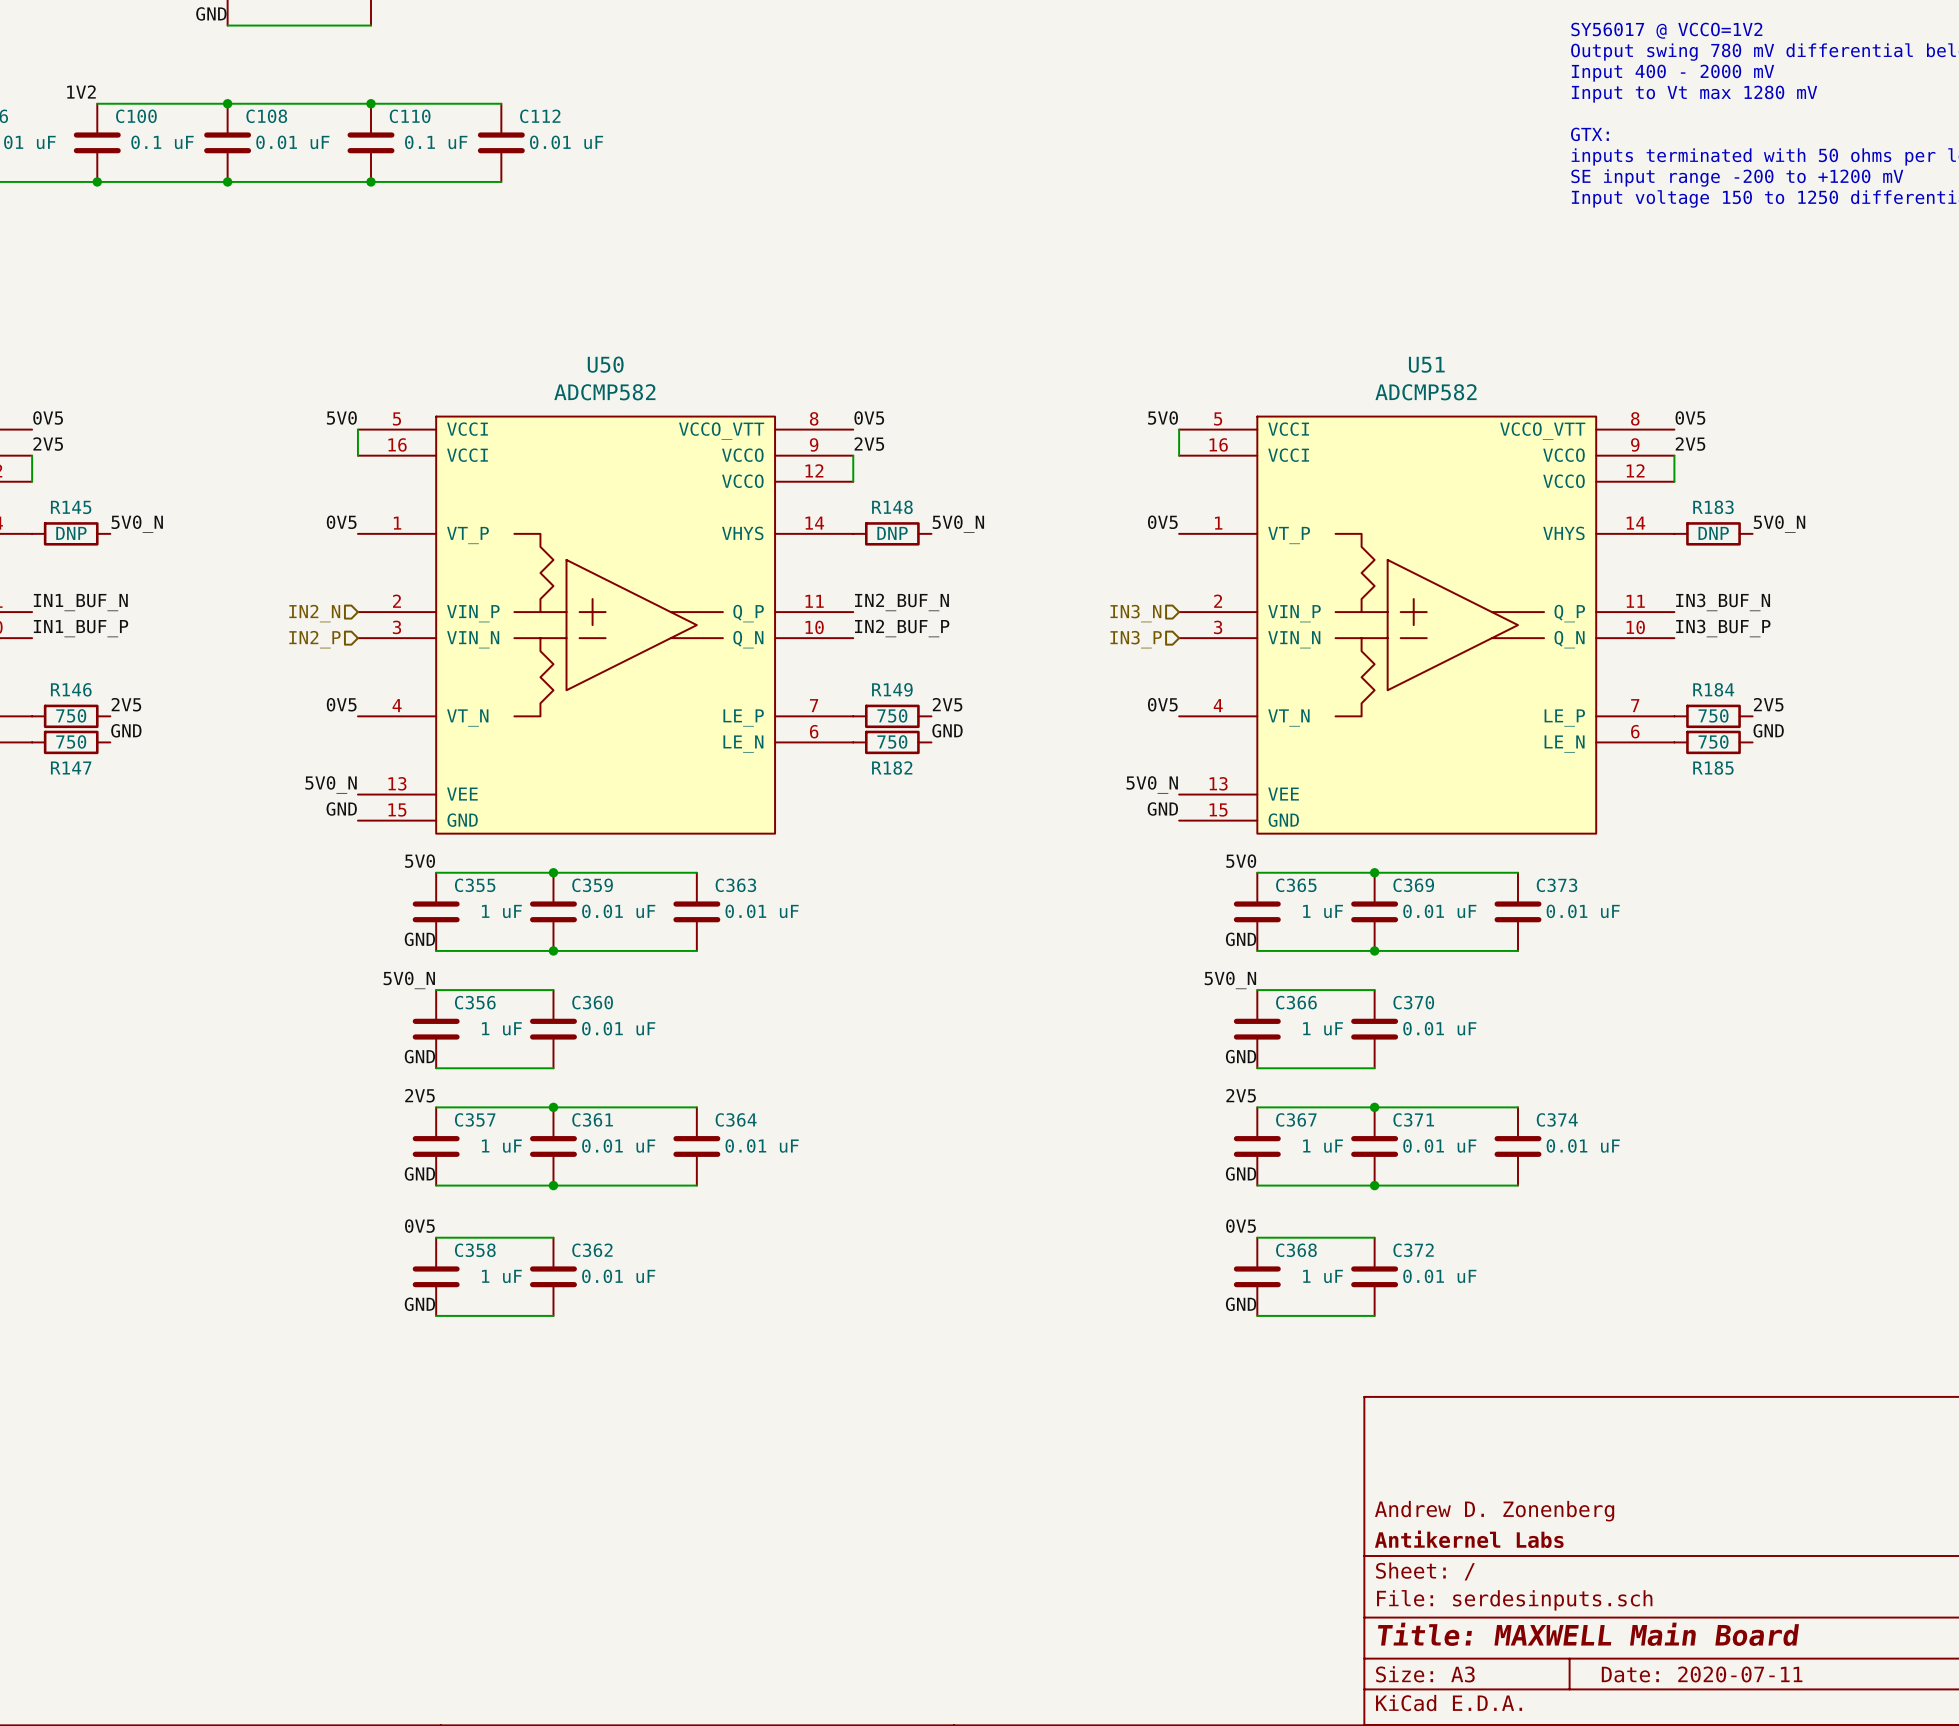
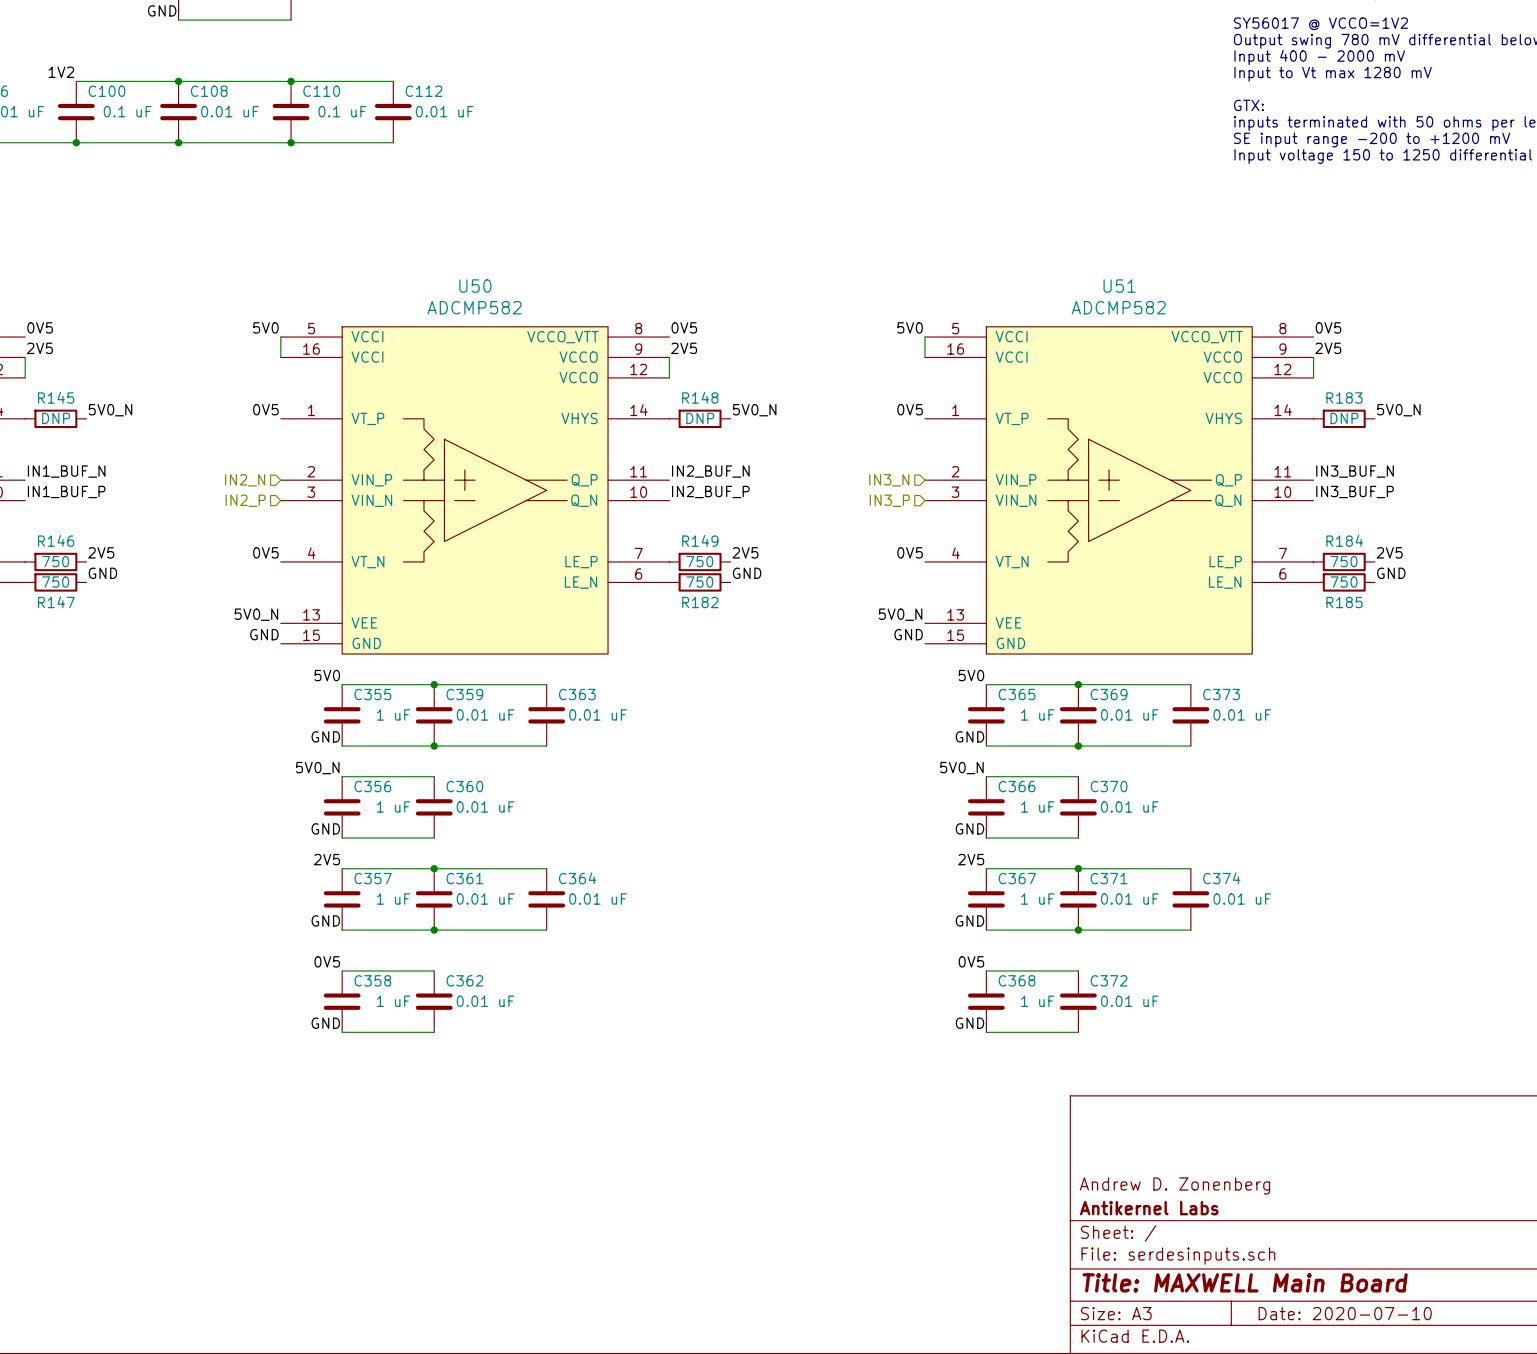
title block: Date: 2020-07-11 (1702, 1674) -> Date: 2020-07-10 (1345, 1313)

